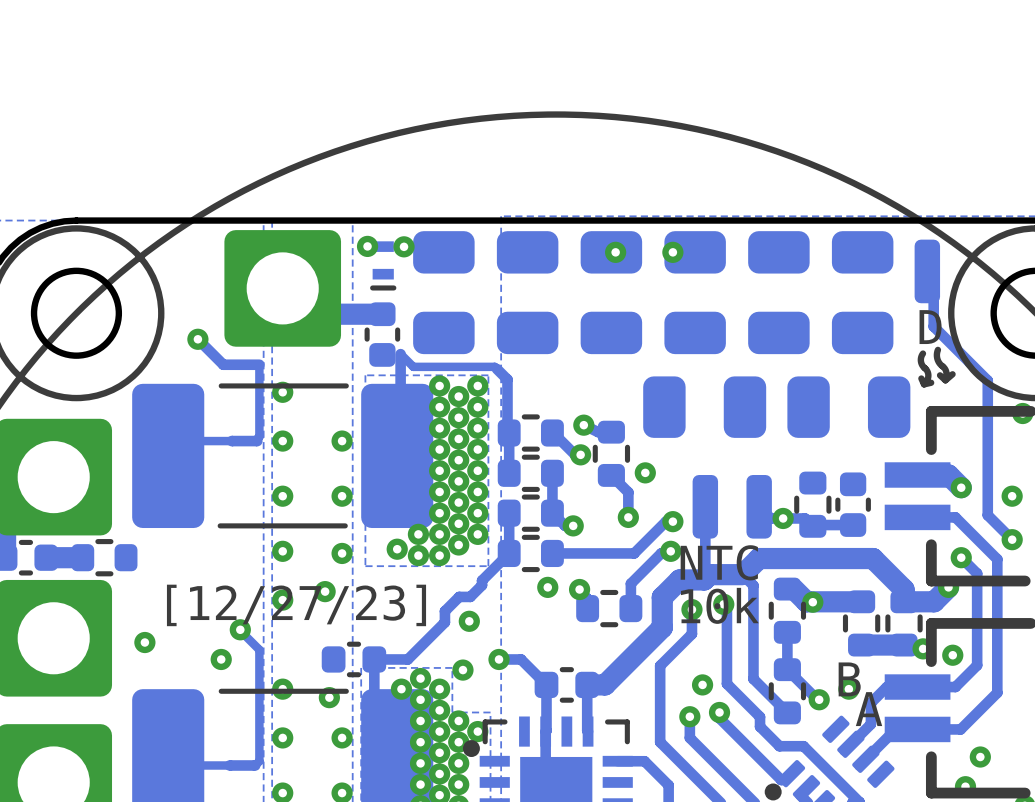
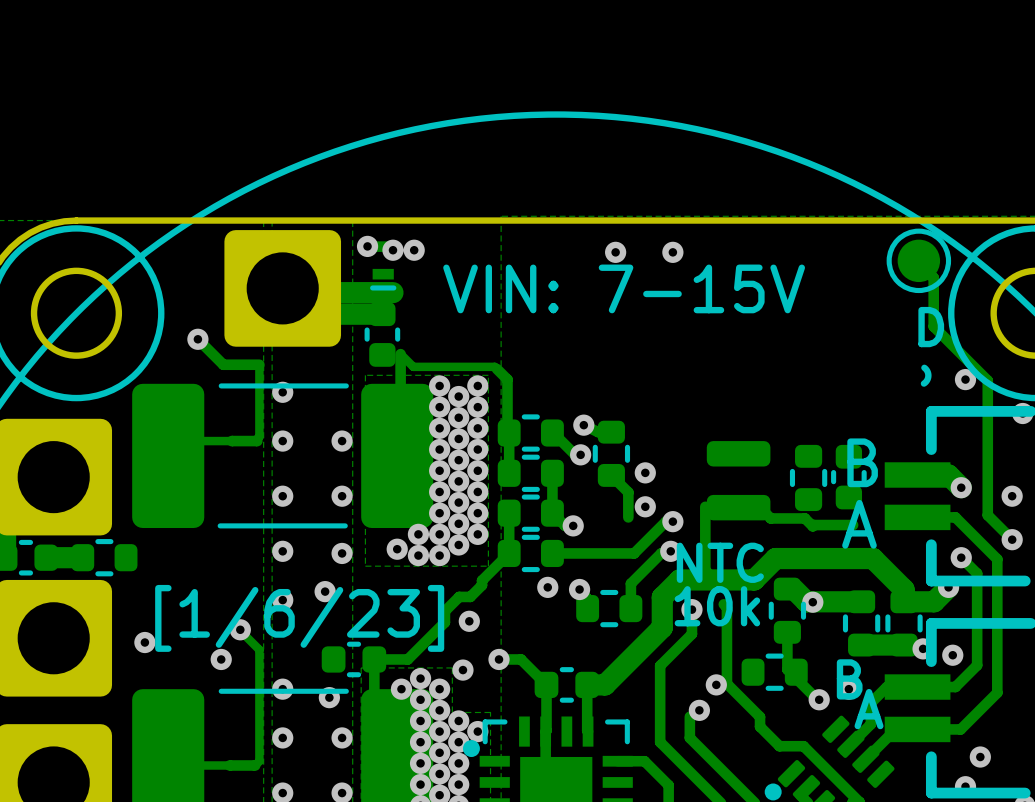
part footprint: [914, 239, 941, 304] -> [886, 228, 952, 294]
via: (404, 246) -> none
via: none -> (392, 250)
via: none -> (414, 250)
text: none -> VIN: 7-15V (624, 288)
track: none -> (392, 292) (286, 292)
part: (443, 292) -> none
part: (527, 292) -> none
part: (611, 292) -> none
part: (695, 292) -> none
part: (778, 292) -> none
part: (862, 292) -> none
line: (937, 349) (937, 358) (945, 370) (945, 378) -> none
line: (922, 353) (920, 361) (925, 368) -> none
line: (952, 374) (945, 380) (940, 375) -> none
line: (921, 378) (924, 384) (931, 382) -> none
via: none -> (965, 379)
part: (704, 407) -> none
part: (848, 407) -> none
text: none -> B (862, 462)
part position: (812, 504) -> (808, 477)
part position: (853, 504) -> (848, 477)
part rotation: 0° (732, 506) -> 90° clockwise (738, 480)
via position: (628, 517) -> (645, 506)
via: (783, 518) -> none
text: none -> A (859, 524)
track: (775, 558) (758, 558) (747, 569) -> none
track: (742, 574) (709, 574) (704, 579) -> (775, 558) (754, 579) (704, 579)
track: (747, 579) (753, 585) (753, 678) (787, 712) -> none
via: (723, 604) -> none
text: [12/27/23] (296, 605) -> [1/6/23] (299, 618)
via position: (702, 684) -> (716, 684)
part rotation: 0° (787, 691) -> 90° clockwise (774, 672)
via: none -> (699, 710)
track: (719, 712) (719, 718) (781, 780) (785, 780) -> none
via: (719, 712) -> none
via: (689, 716) -> none

